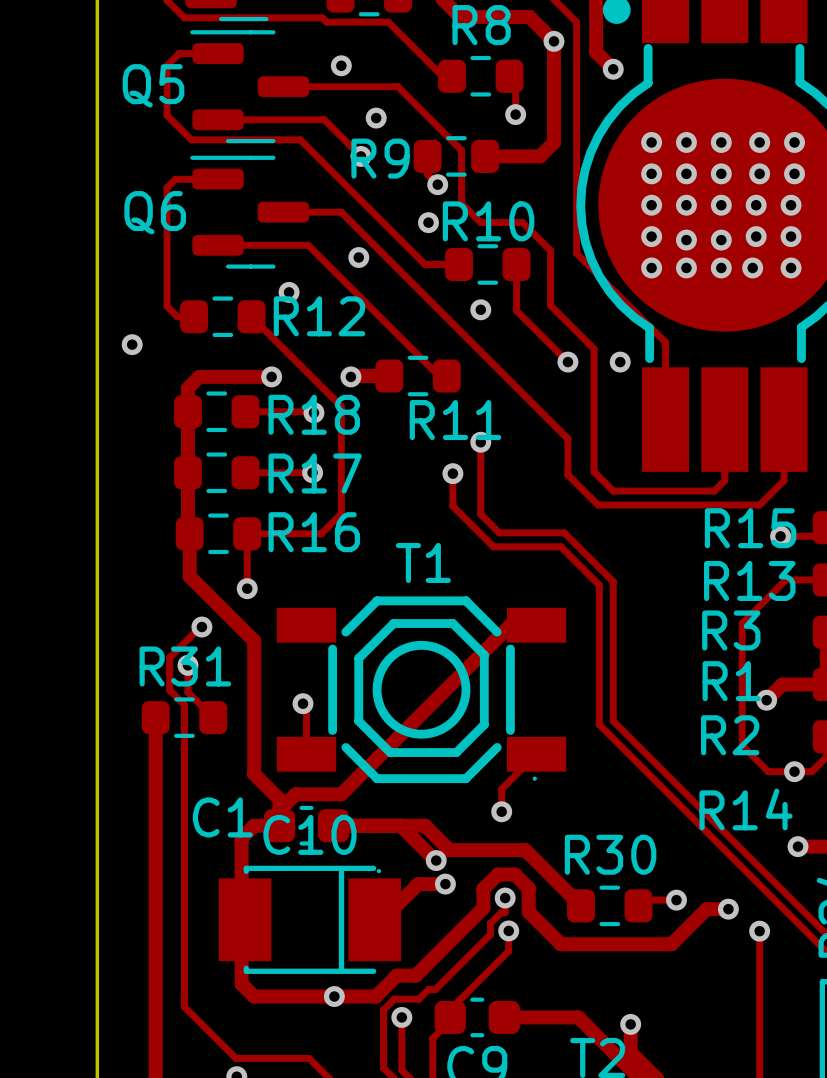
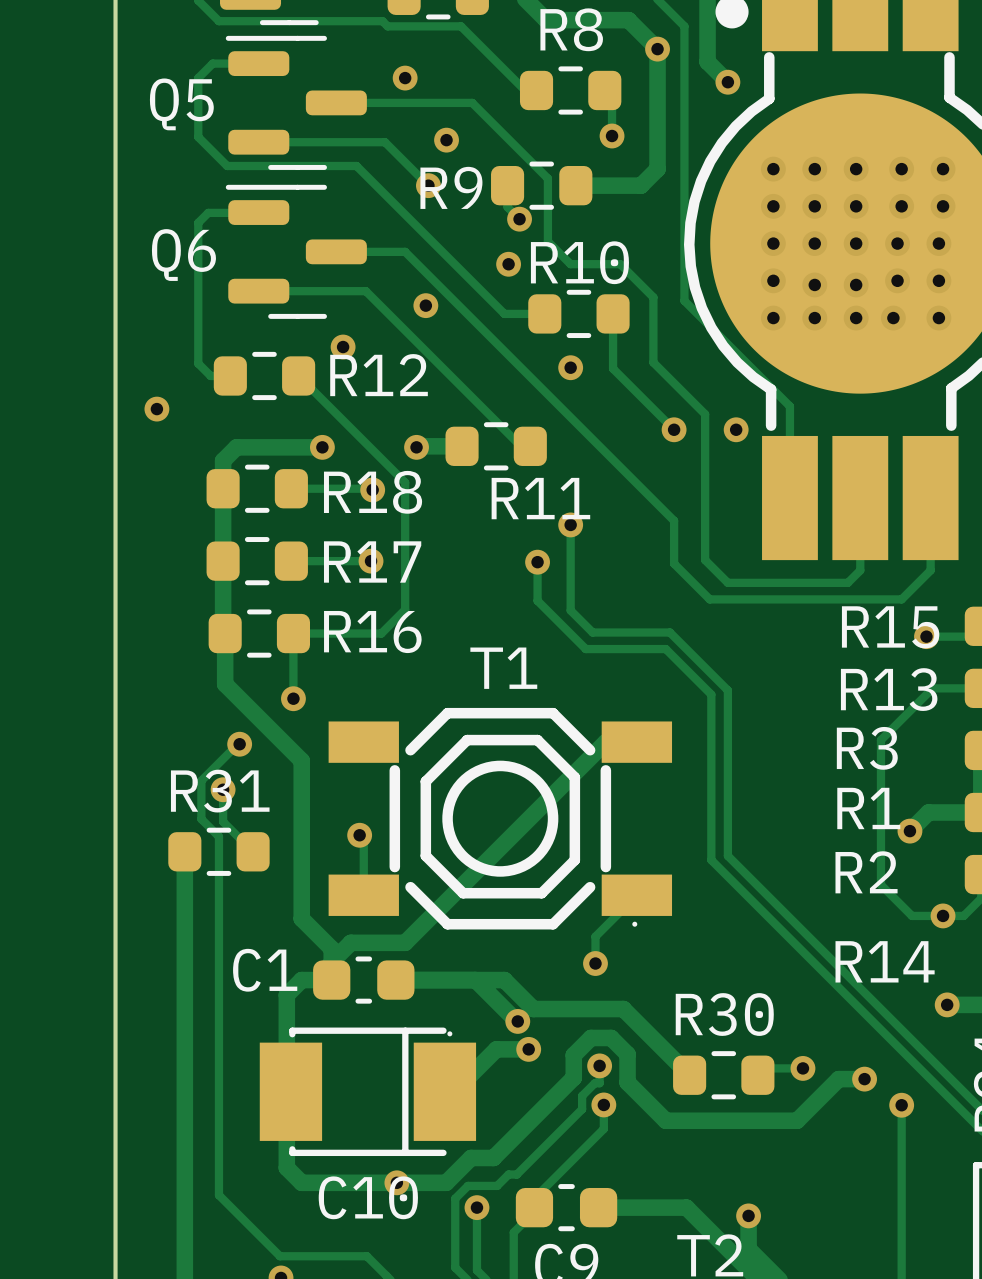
C10 name position: C10 (309, 834) -> C10 (368, 1197)

